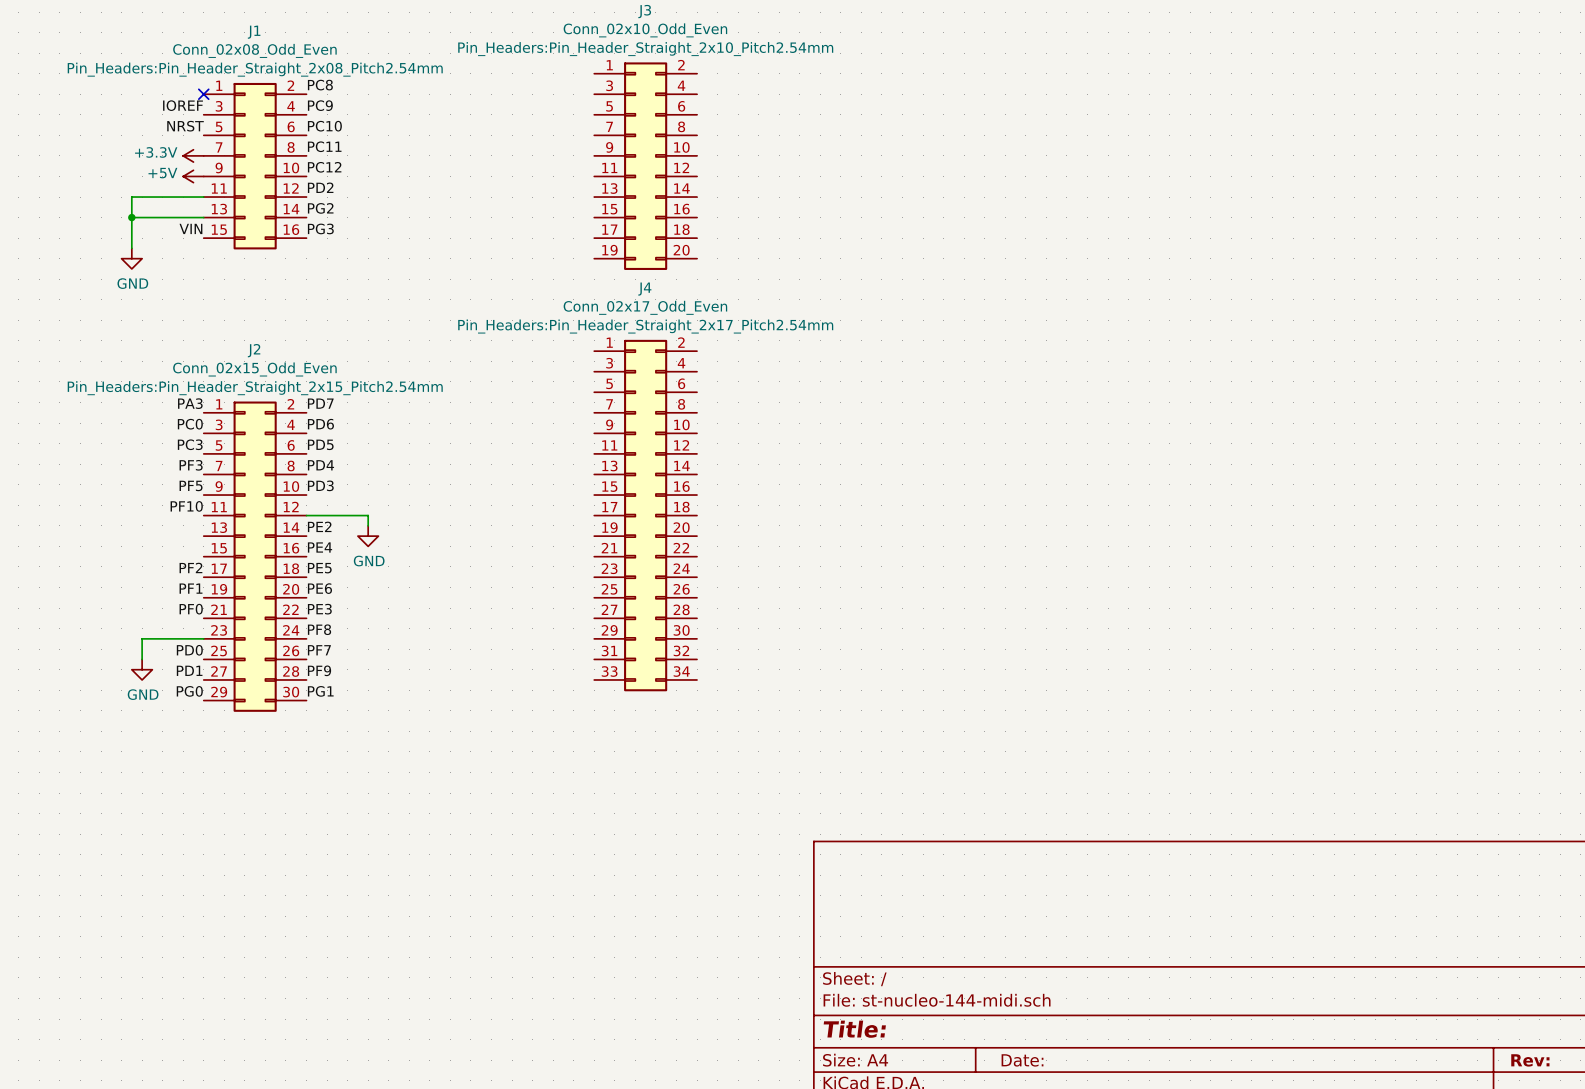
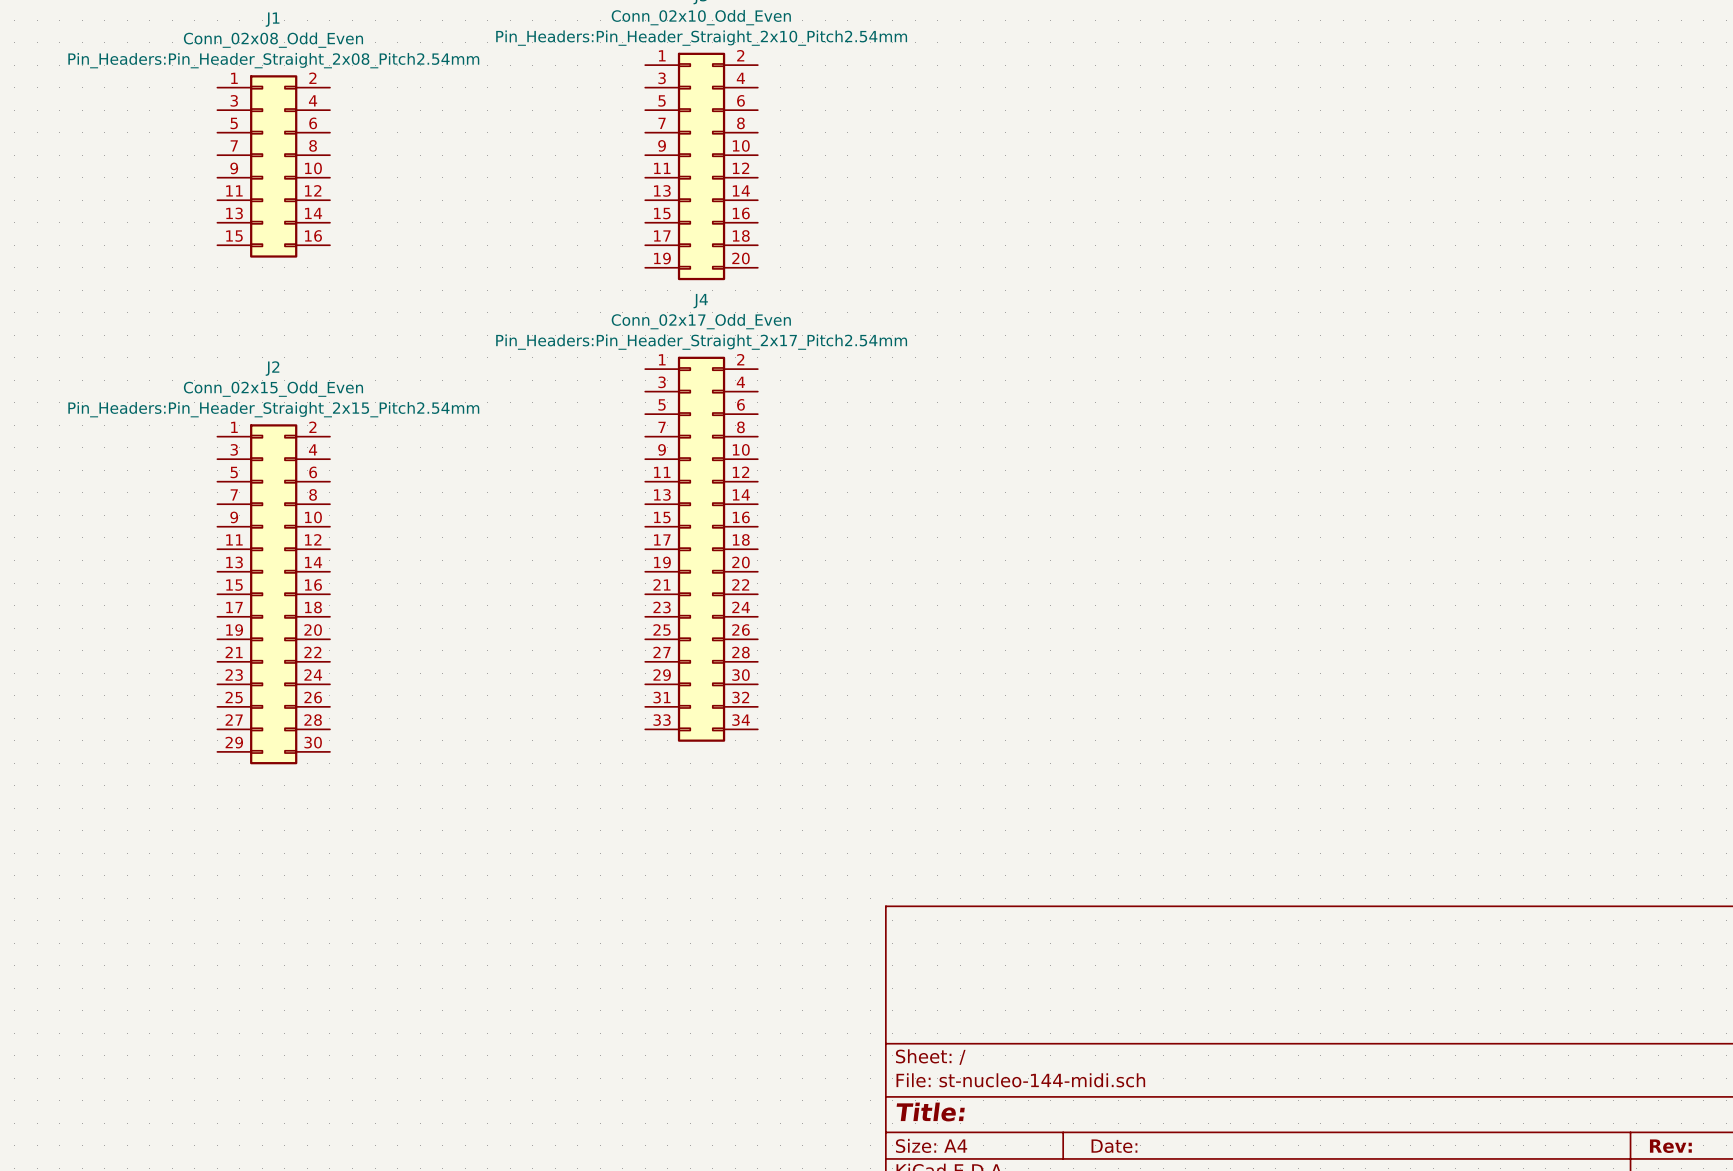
label: PC8 (320, 85) -> none
no-connect mark: (203, 94) -> none
label: IOREF (183, 105) -> none
label: PC9 (320, 105) -> none
label: NRST (185, 126) -> none
label: PC10 (324, 126) -> none
label: PC11 (324, 146) -> none
power symbol: +3.3V (193, 155) -> none
label: PC12 (324, 167) -> none
power symbol: +5V (193, 176) -> none
label: PD2 (320, 187) -> none
wire: (203, 197) (131, 197) (131, 248) -> none
label: PG2 (320, 208) -> none
wire: (131, 217) (203, 217) -> none
junction: (131, 217) -> none
label: VIN (190, 228) -> none
label: PG3 (320, 228) -> none
power symbol: GND (131, 258) -> none
label: PA3 (190, 403) -> none
label: PD7 (320, 403) -> none
label: PC0 (190, 424) -> none
label: PD6 (320, 424) -> none
label: PC3 (190, 444) -> none
label: PD5 (320, 444) -> none
label: PF3 (191, 465) -> none
label: PD4 (320, 465) -> none
label: PF5 (191, 485) -> none
label: PD3 (320, 485) -> none
label: PF10 (186, 506) -> none
wire: (306, 515) (368, 515) (368, 525) -> none
label: PE2 (319, 526) -> none
power symbol: GND (368, 536) -> none
label: PE4 (320, 547) -> none
label: PF2 (190, 567) -> none
label: PE5 (319, 568) -> none
label: PF1 (191, 588) -> none
label: PE6 (319, 588) -> none
label: PF0 (191, 609) -> none
label: PE3 (319, 609) -> none
label: PF8 (319, 629) -> none
wire: (203, 638) (142, 638) (142, 659) -> none
label: PD0 (189, 650) -> none
label: PF7 (319, 650) -> none
power symbol: GND (142, 669) -> none
label: PD1 (189, 670) -> none
label: PF9 (319, 670) -> none
label: PG0 (189, 691) -> none
label: PG1 (320, 691) -> none

